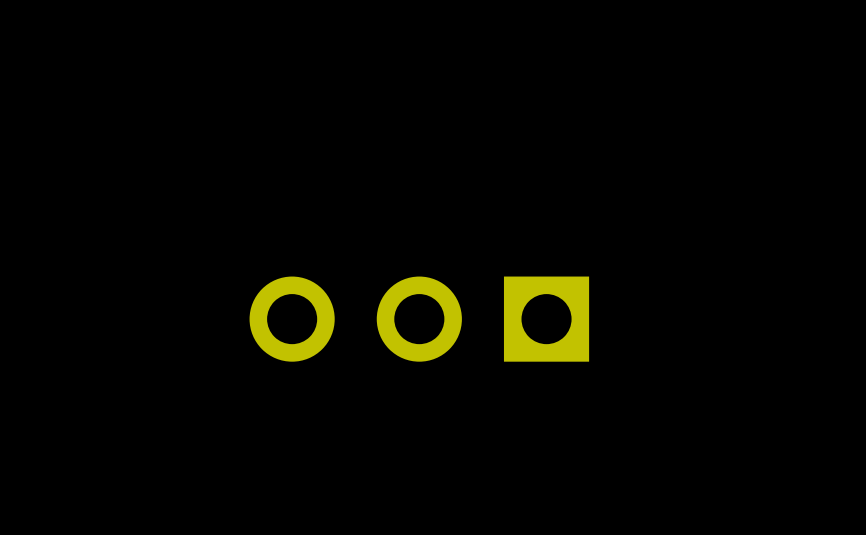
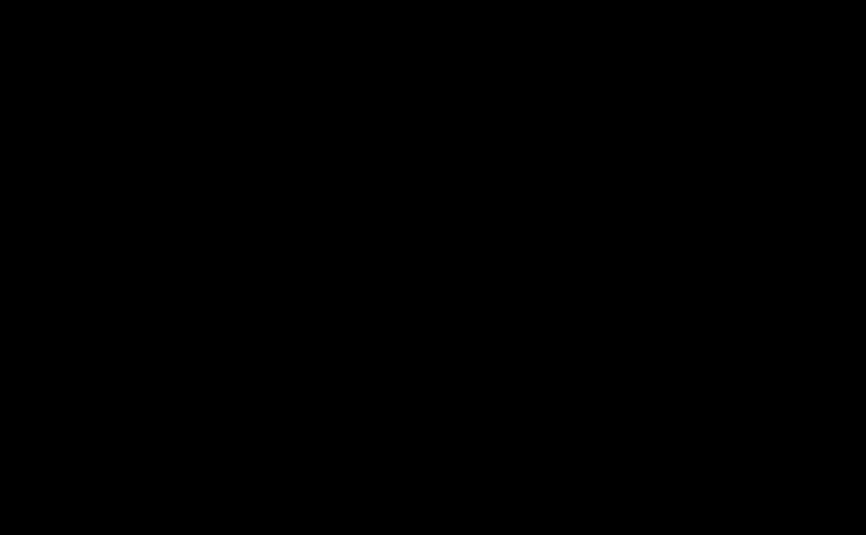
part: (419, 319) -> none

